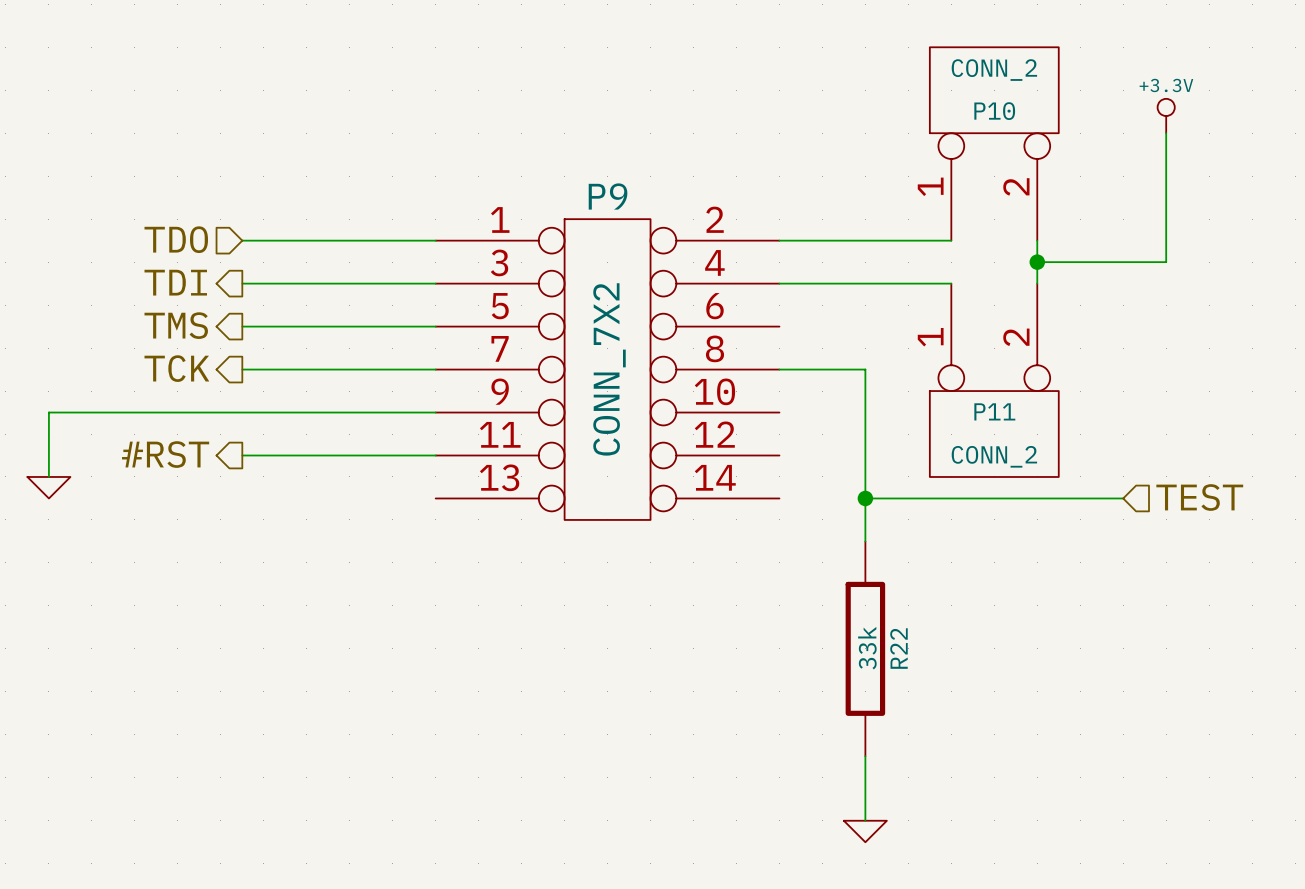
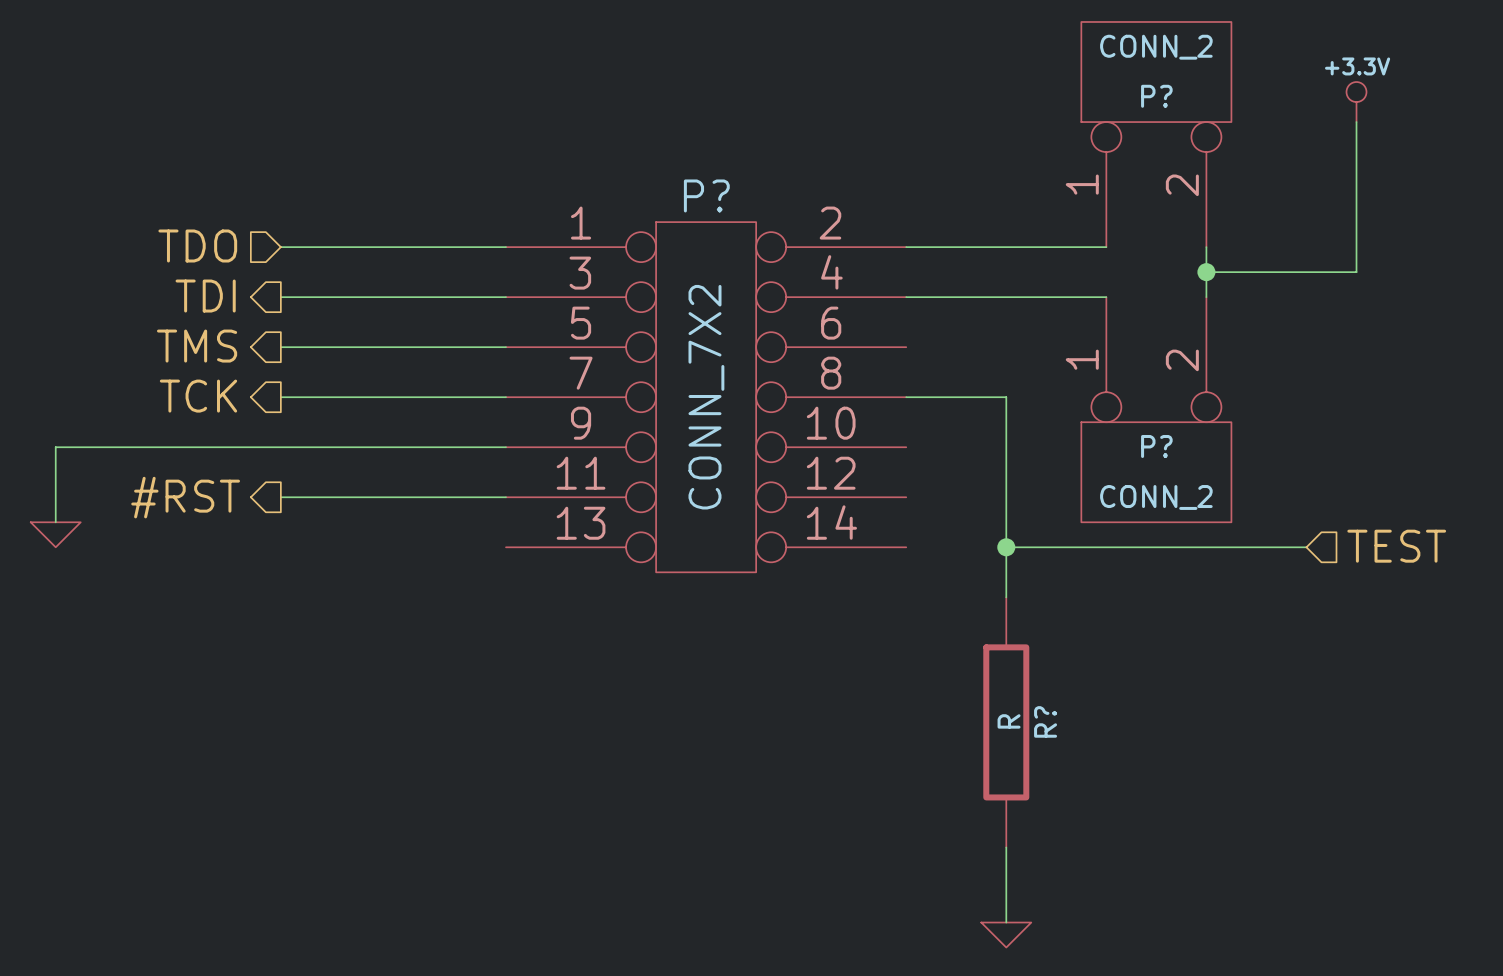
P10 name: P10 (994, 111) -> P? (1156, 96)
P9 name: P9 (608, 196) -> P? (706, 195)
P11 name: P11 (994, 411) -> P? (1156, 446)
R22 value: 33k (867, 648) -> R (1009, 721)
R22 name: R22 (898, 648) -> R? (1045, 721)

